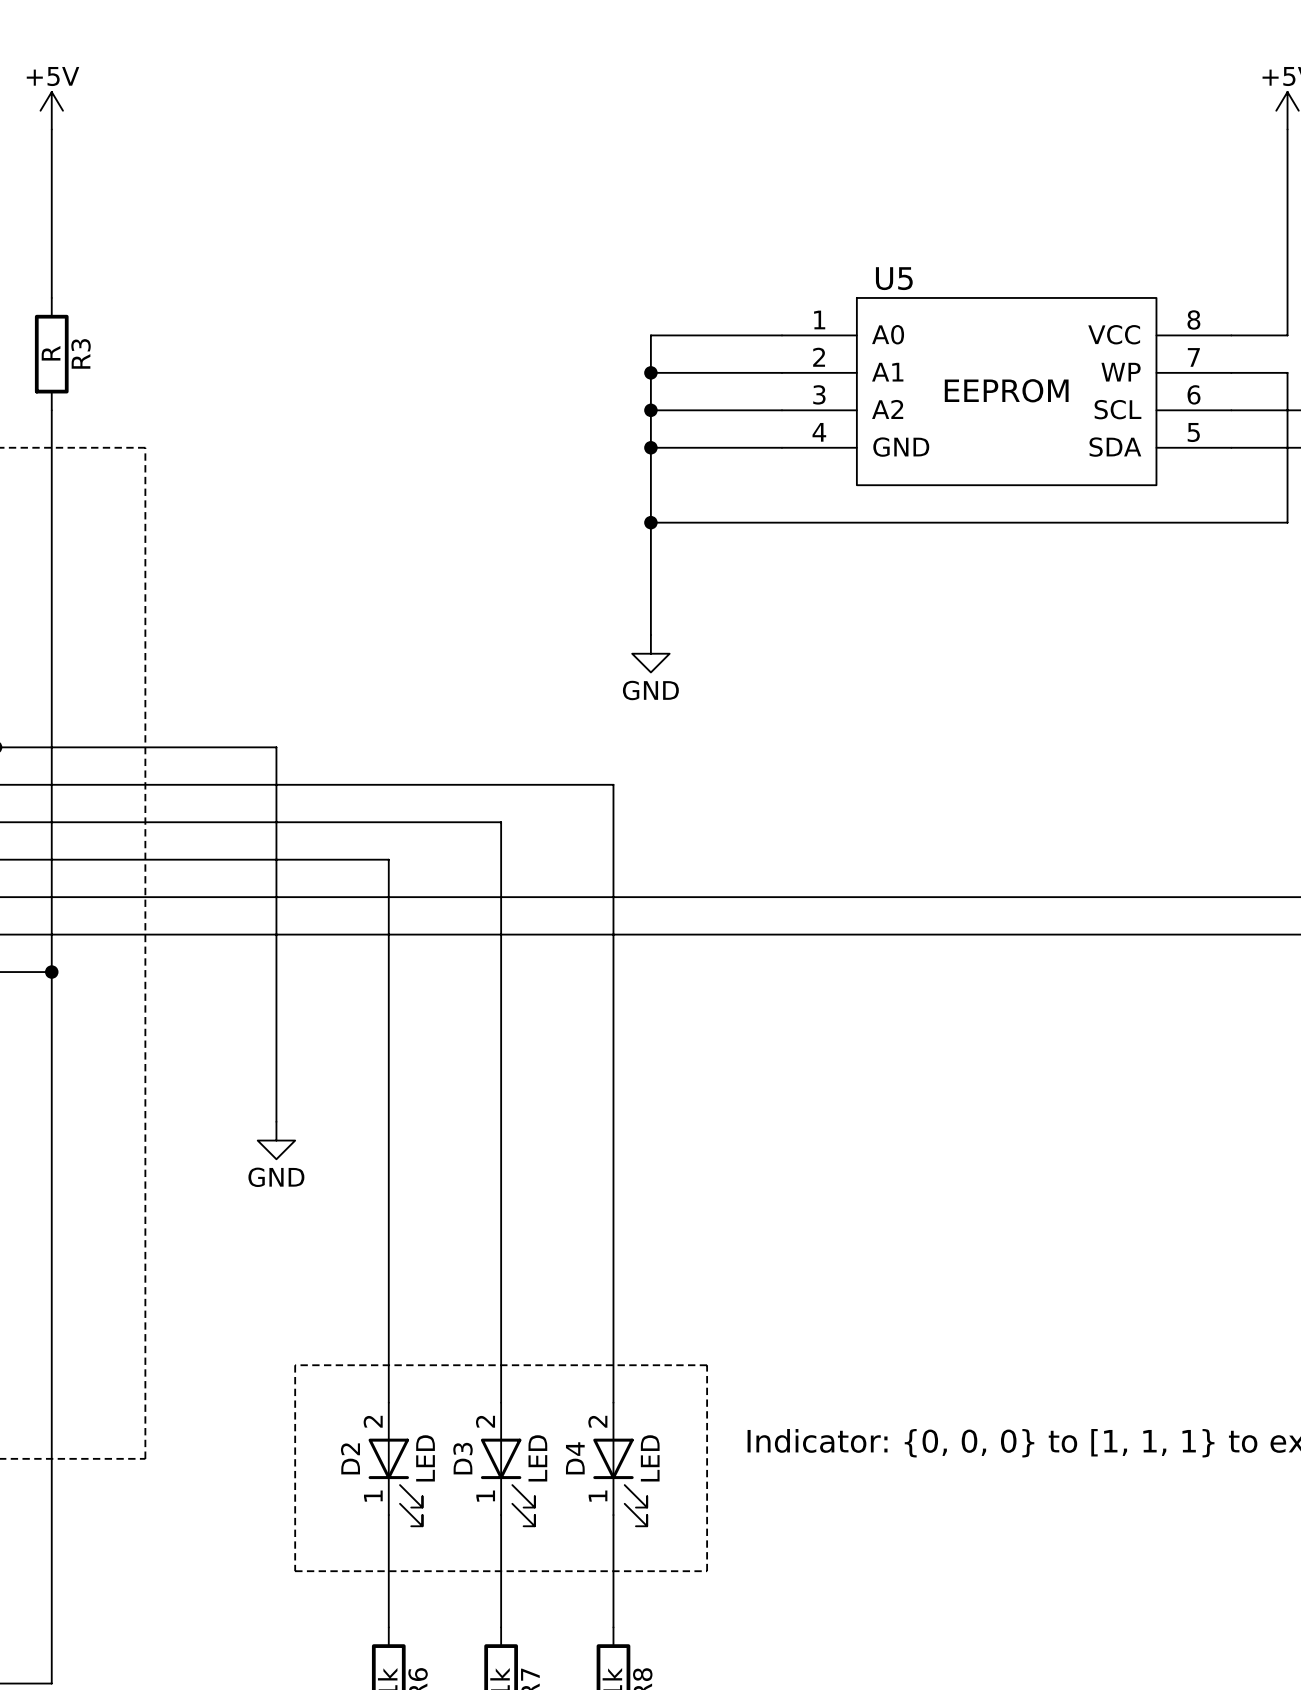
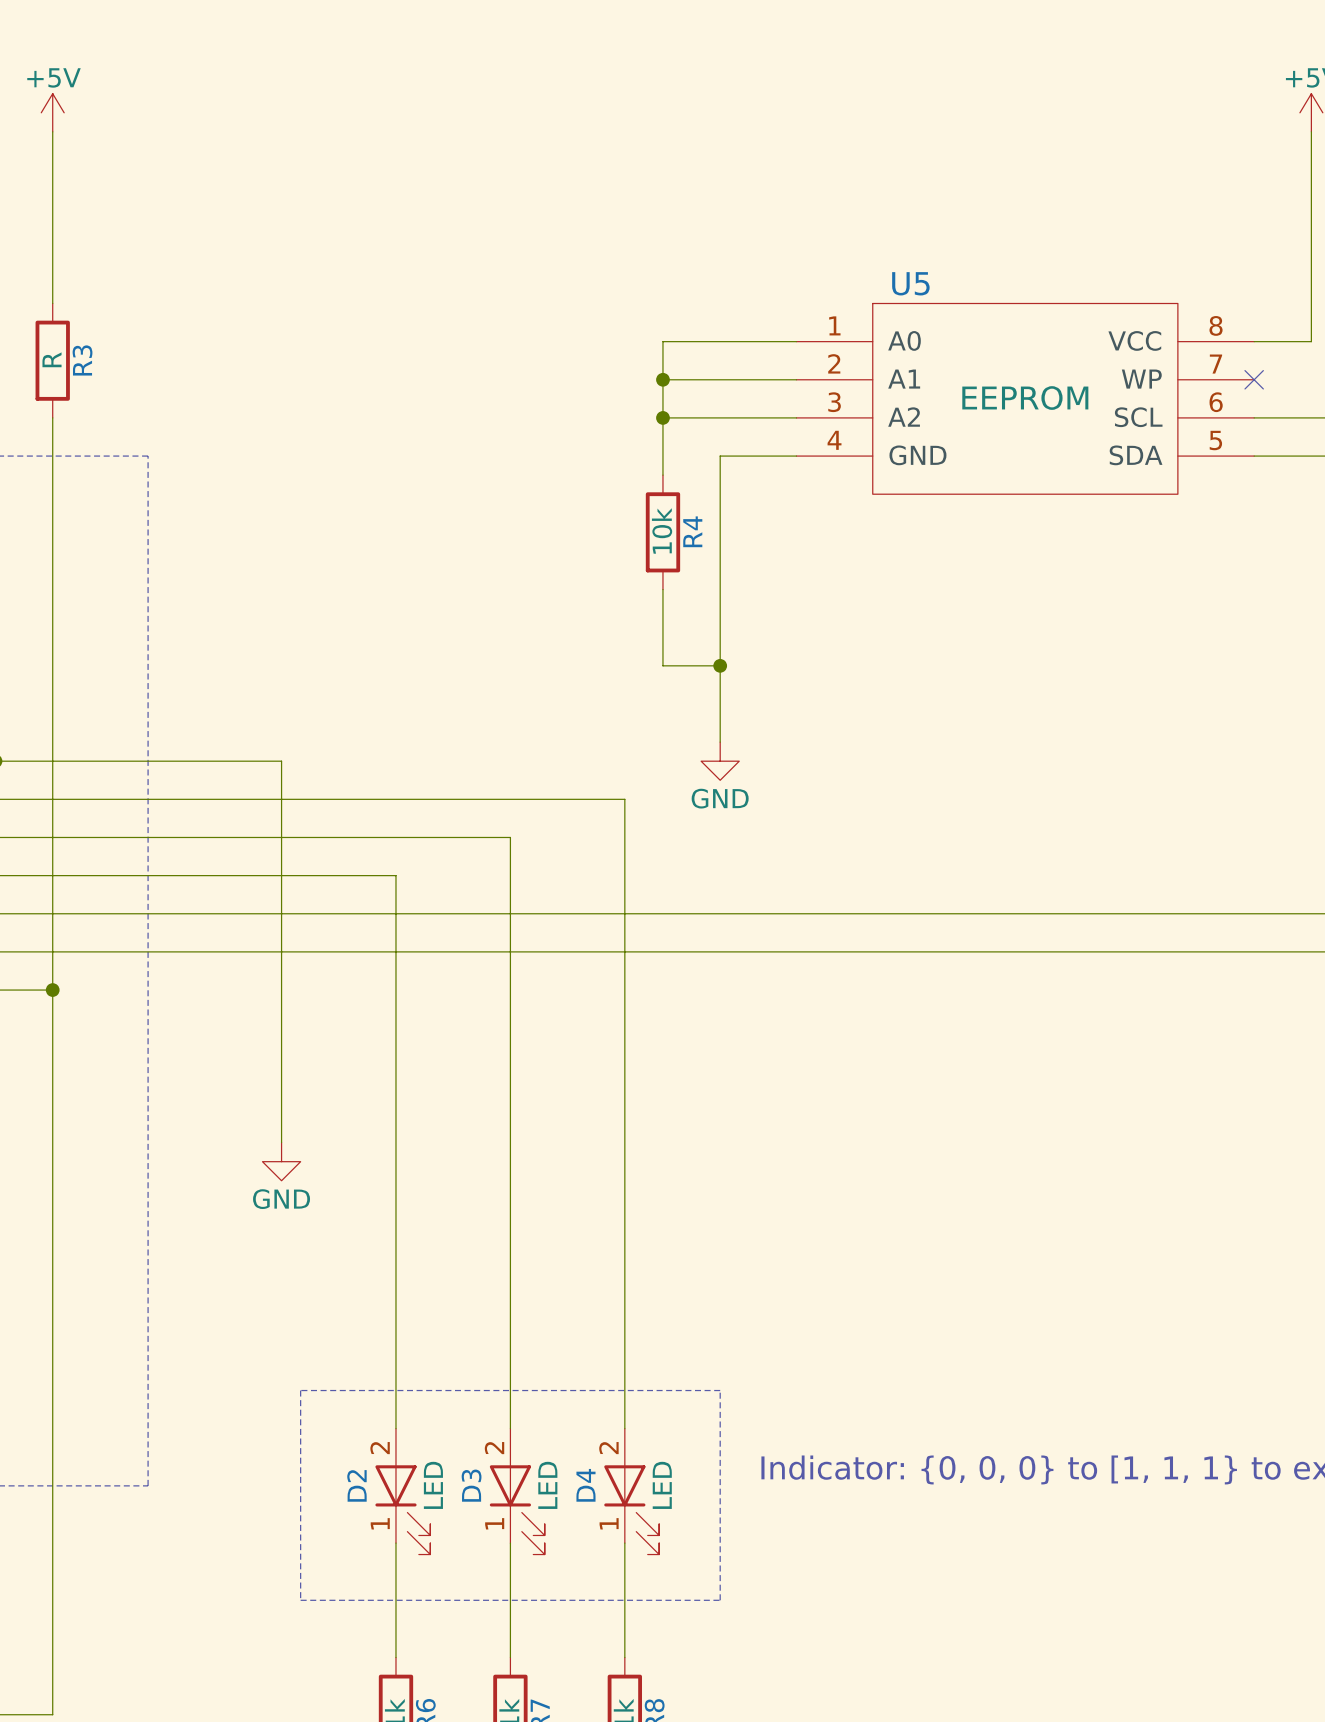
wire: (1231, 372) (1287, 372) (1287, 522) (650, 522) -> none
no-connect mark: none -> (1254, 379)
wire: (650, 447) (707, 447) -> (720, 742) (720, 456)
junction: (650, 447) -> none
wire: (650, 466) (650, 578) -> none
junction: (650, 522) -> none
R4: none -> 10k (662, 532)
wire: none -> (662, 646) (662, 665) (720, 665)
power symbol position: GND (650, 653) -> GND (720, 761)
junction: none -> (720, 665)

